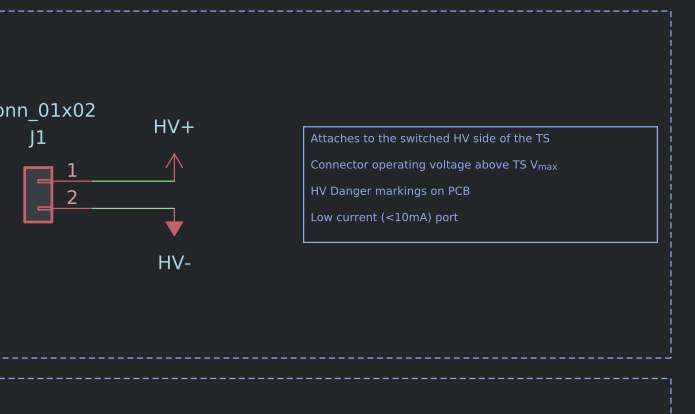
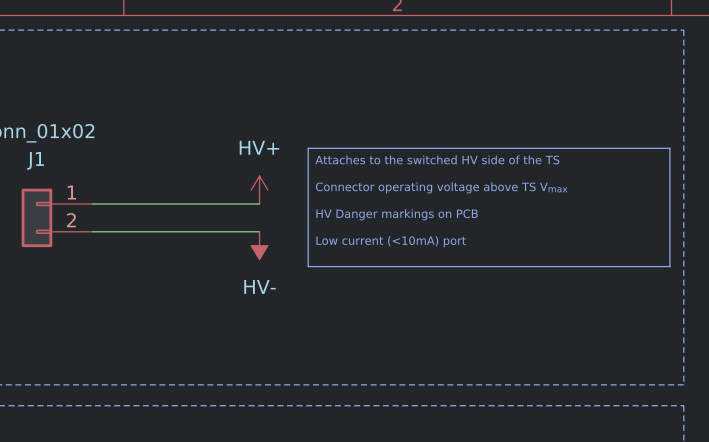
power symbol position: HV+ (174, 167) -> HV+ (259, 190)
wire: none -> (176, 203) (259, 203)
wire: none -> (176, 231) (259, 231)
power symbol position: HV- (174, 222) -> HV- (259, 245)

